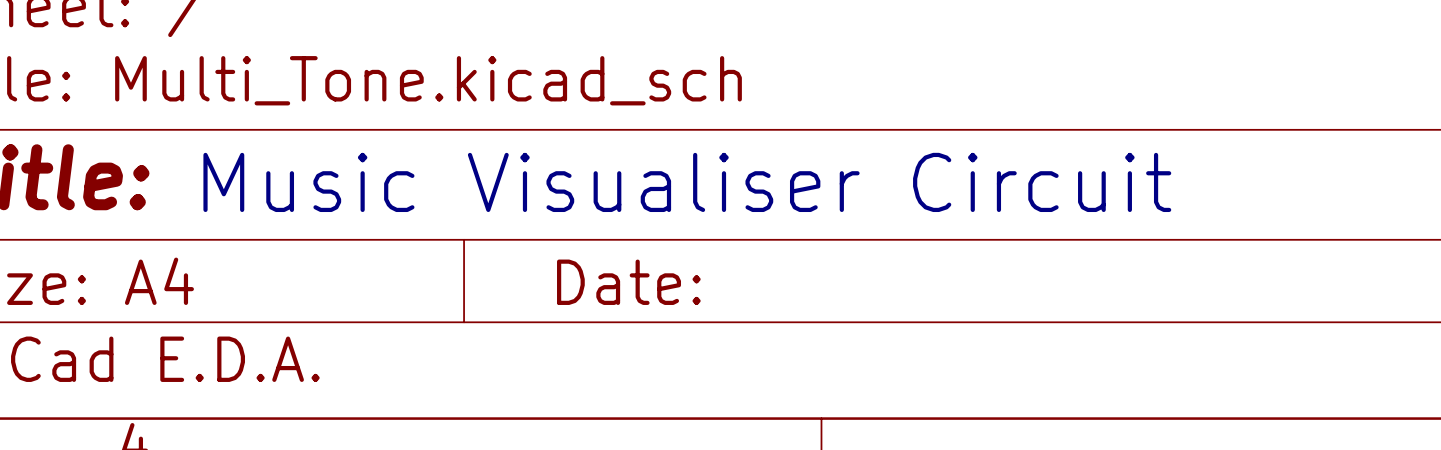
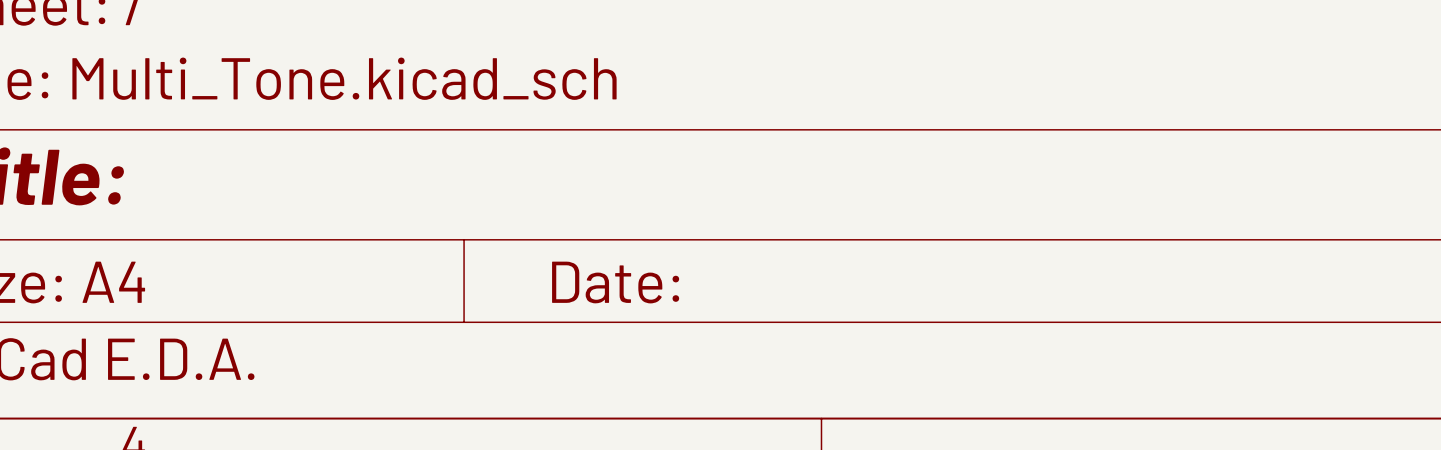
text: Music Visualiser Circuit (687, 182) -> none

